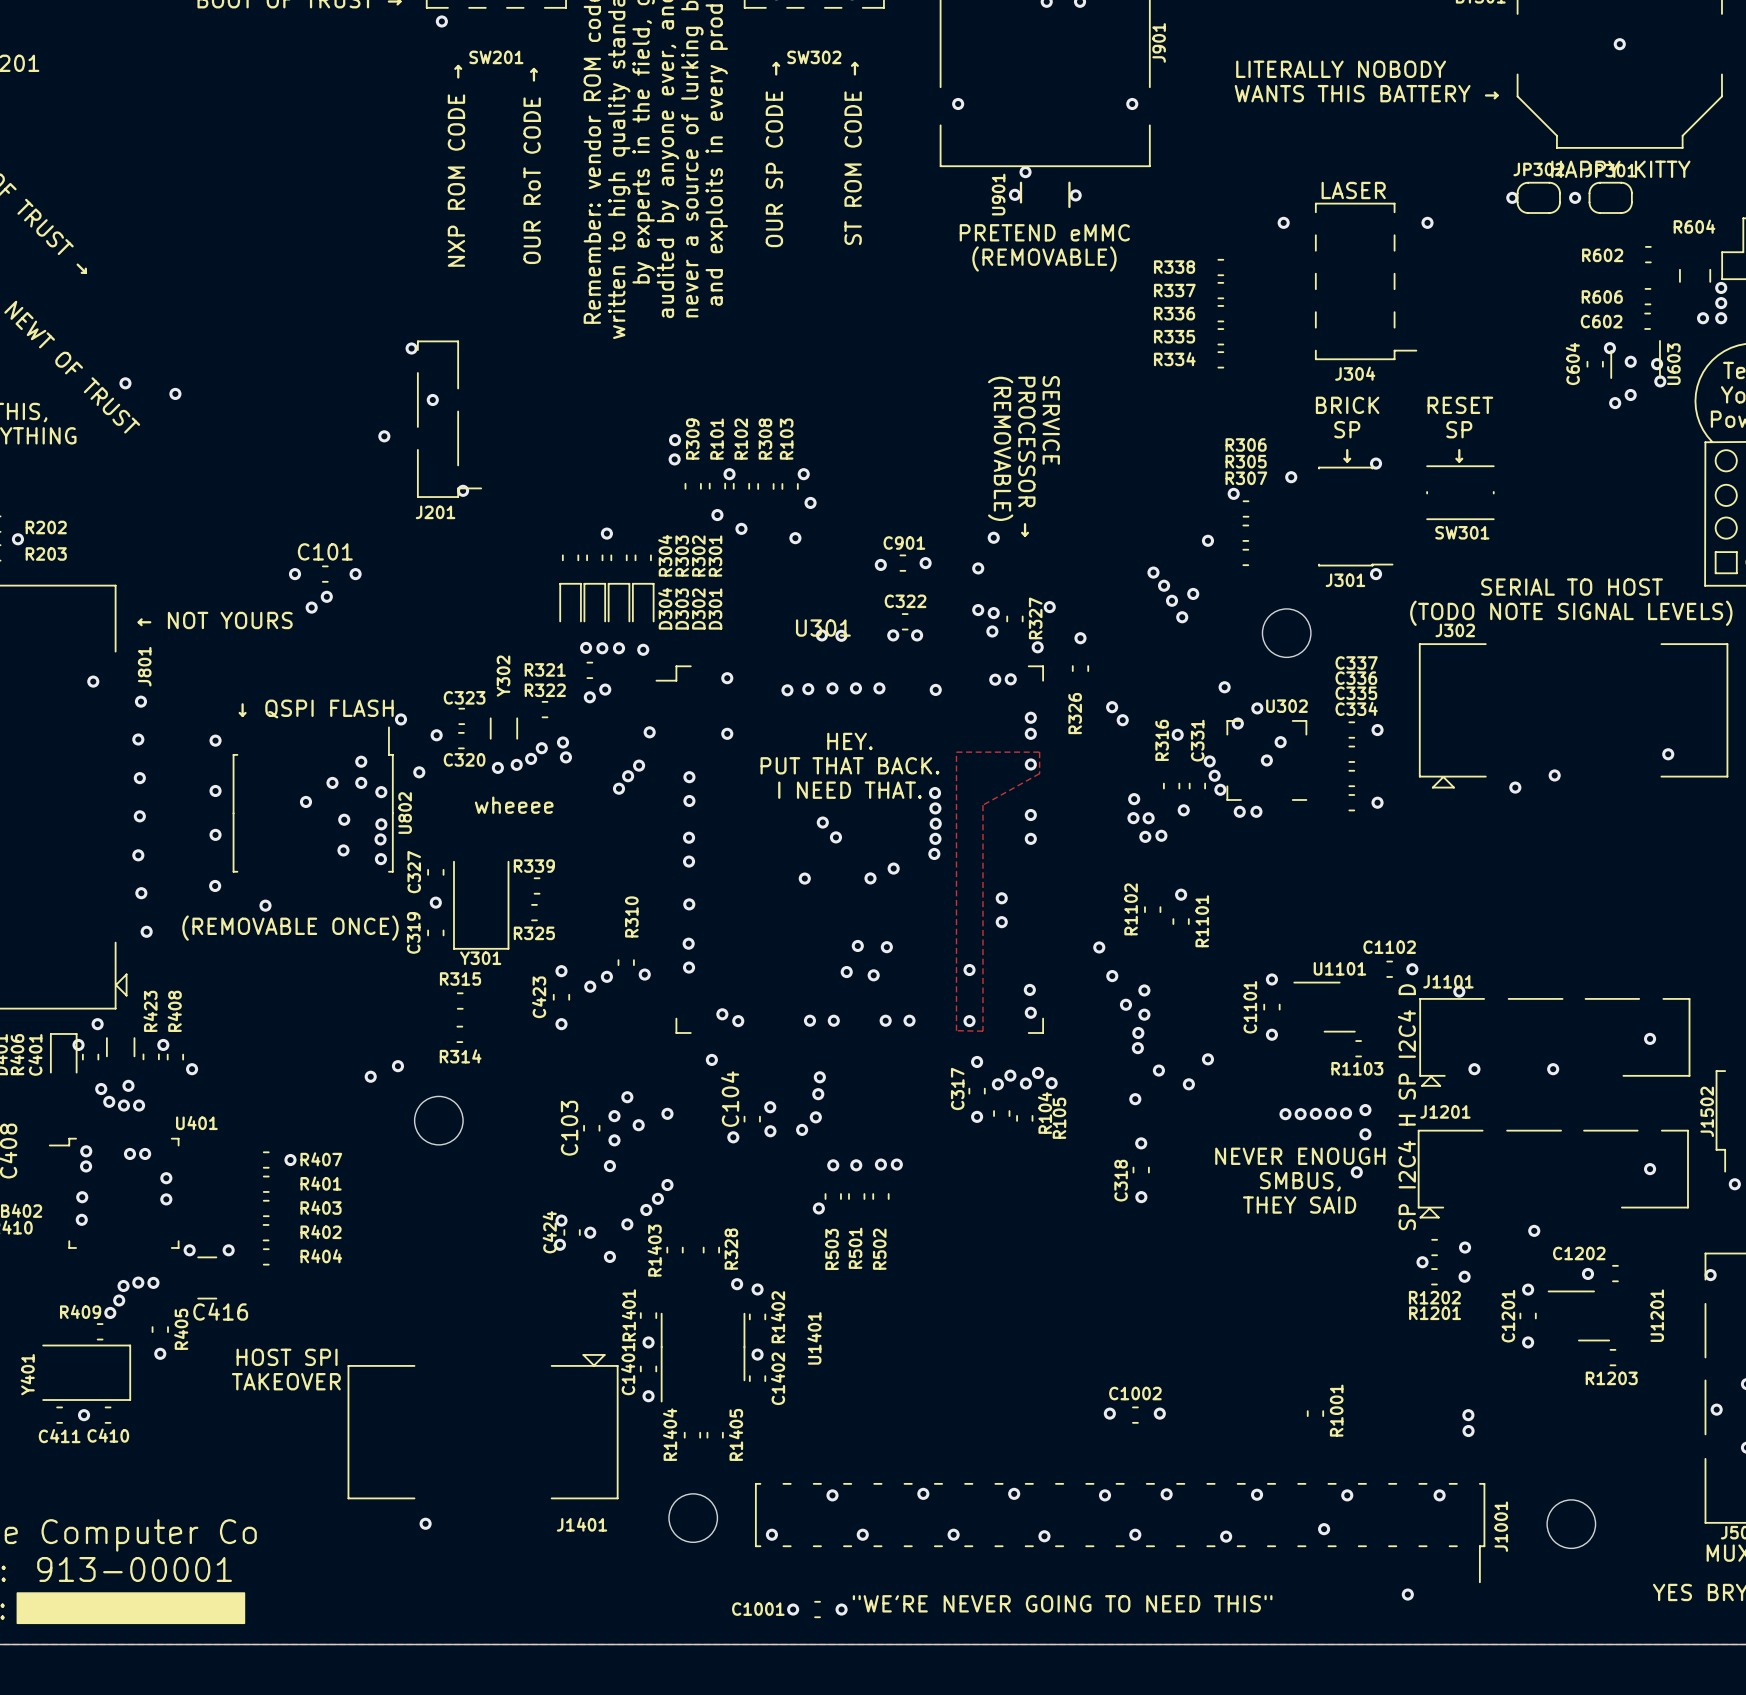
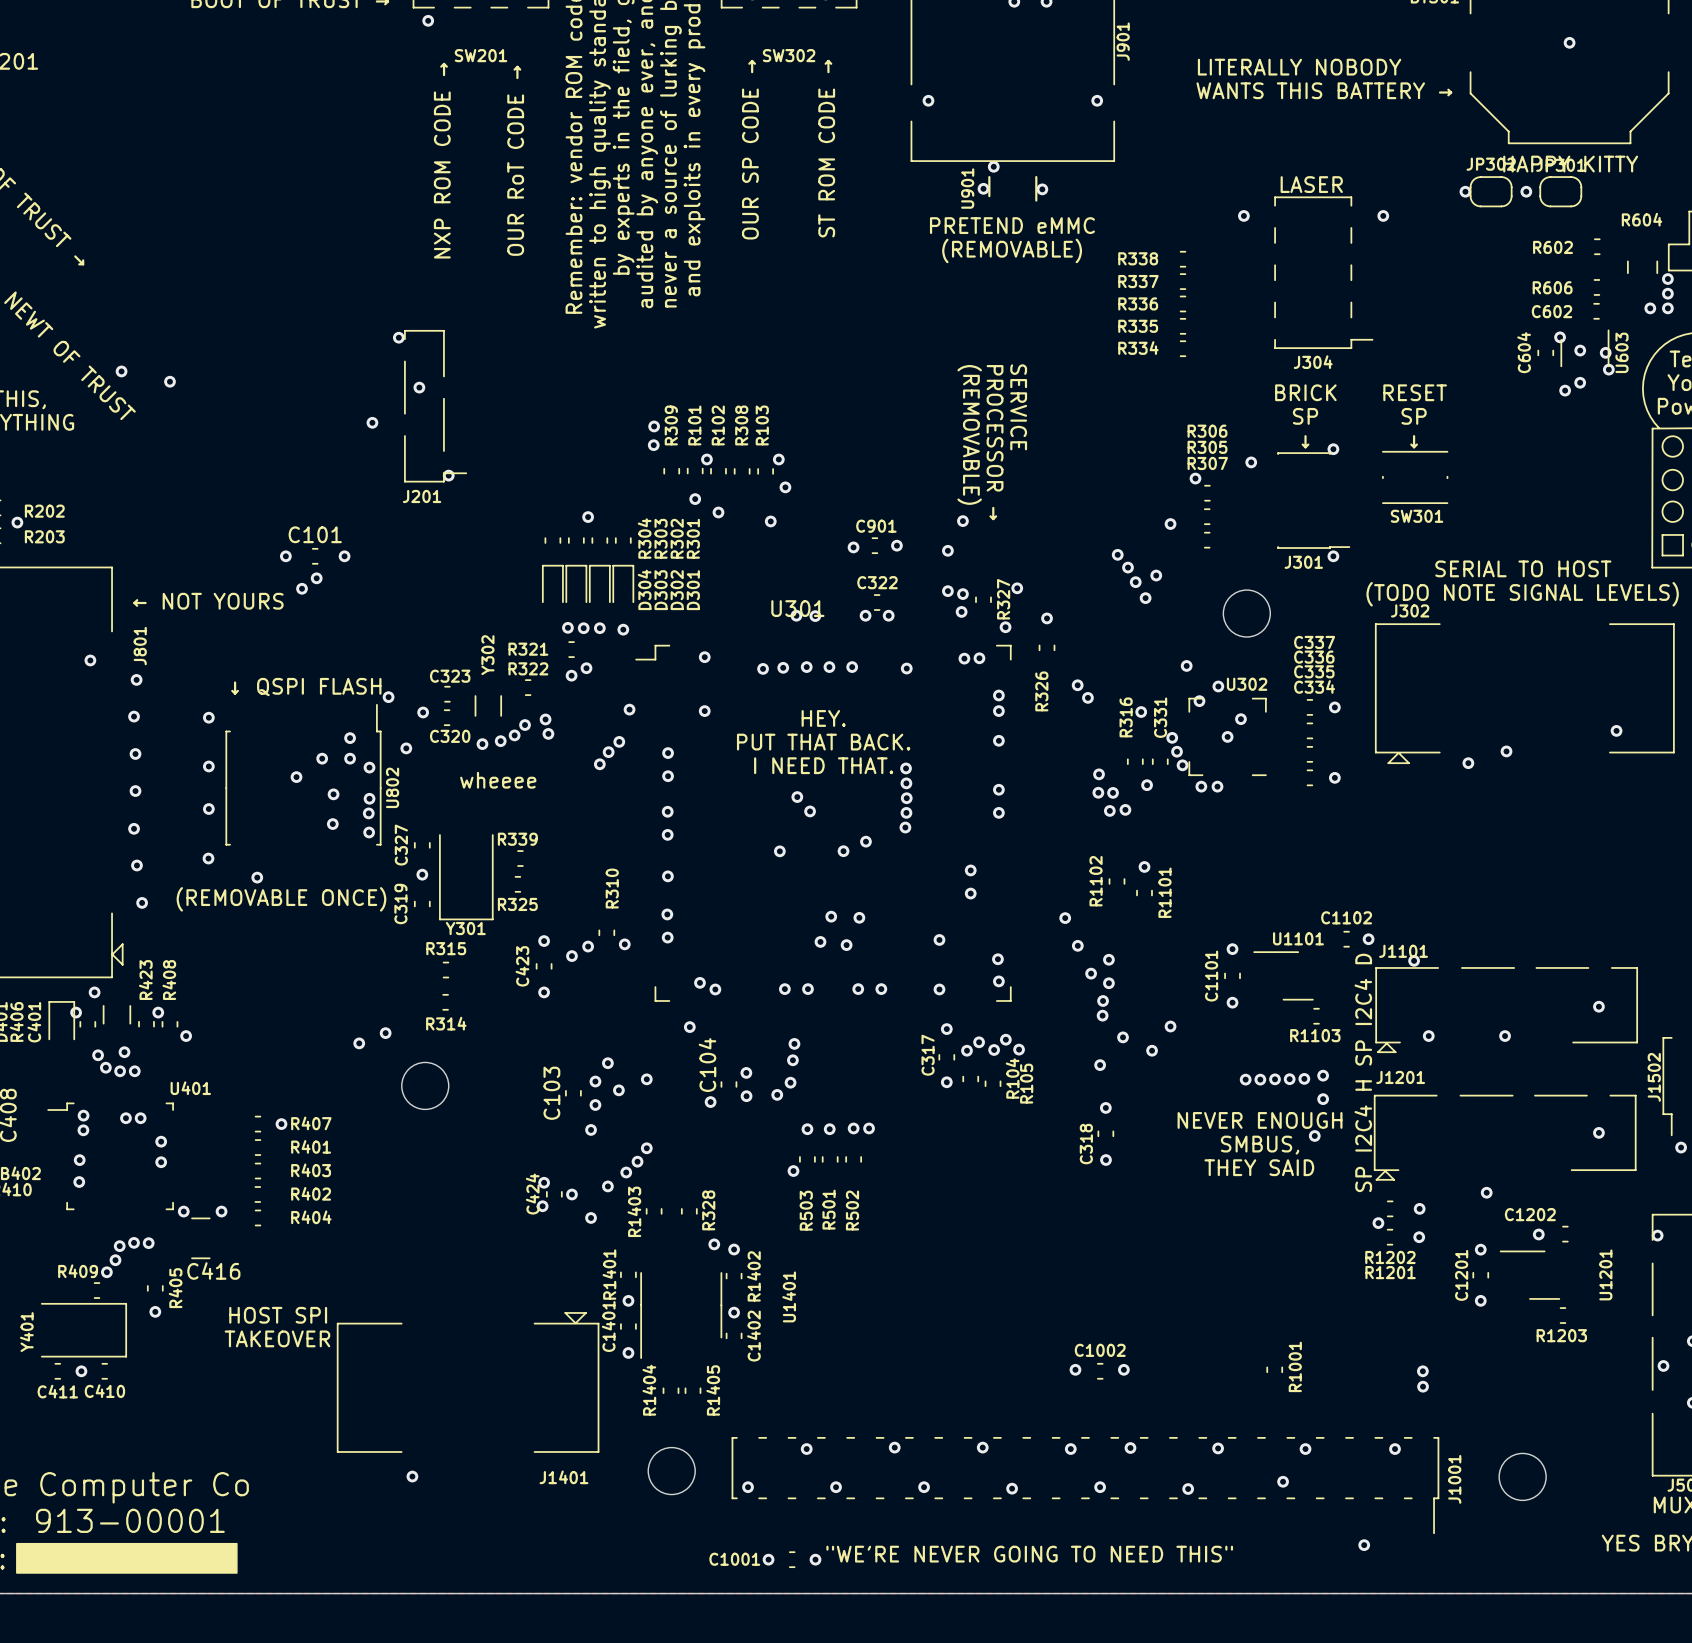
zone outline: (956, 752) (956, 1030) (982, 1031) (982, 805) (1039, 773) (1039, 752) (956, 752) -> none

